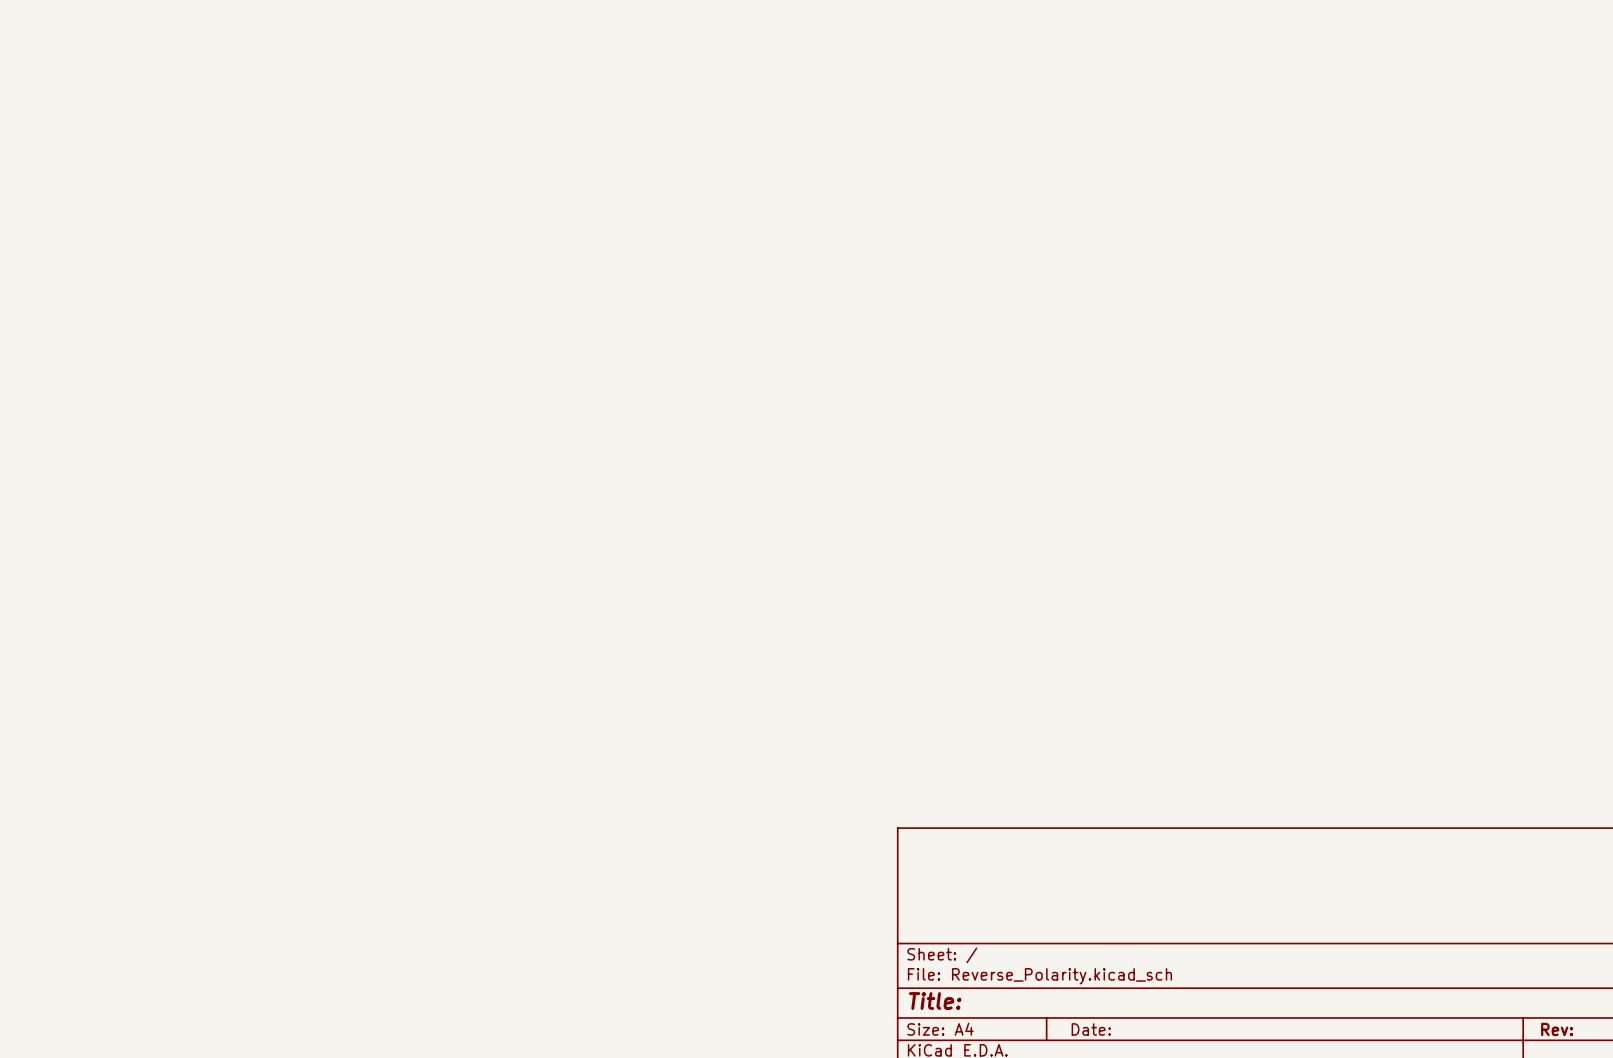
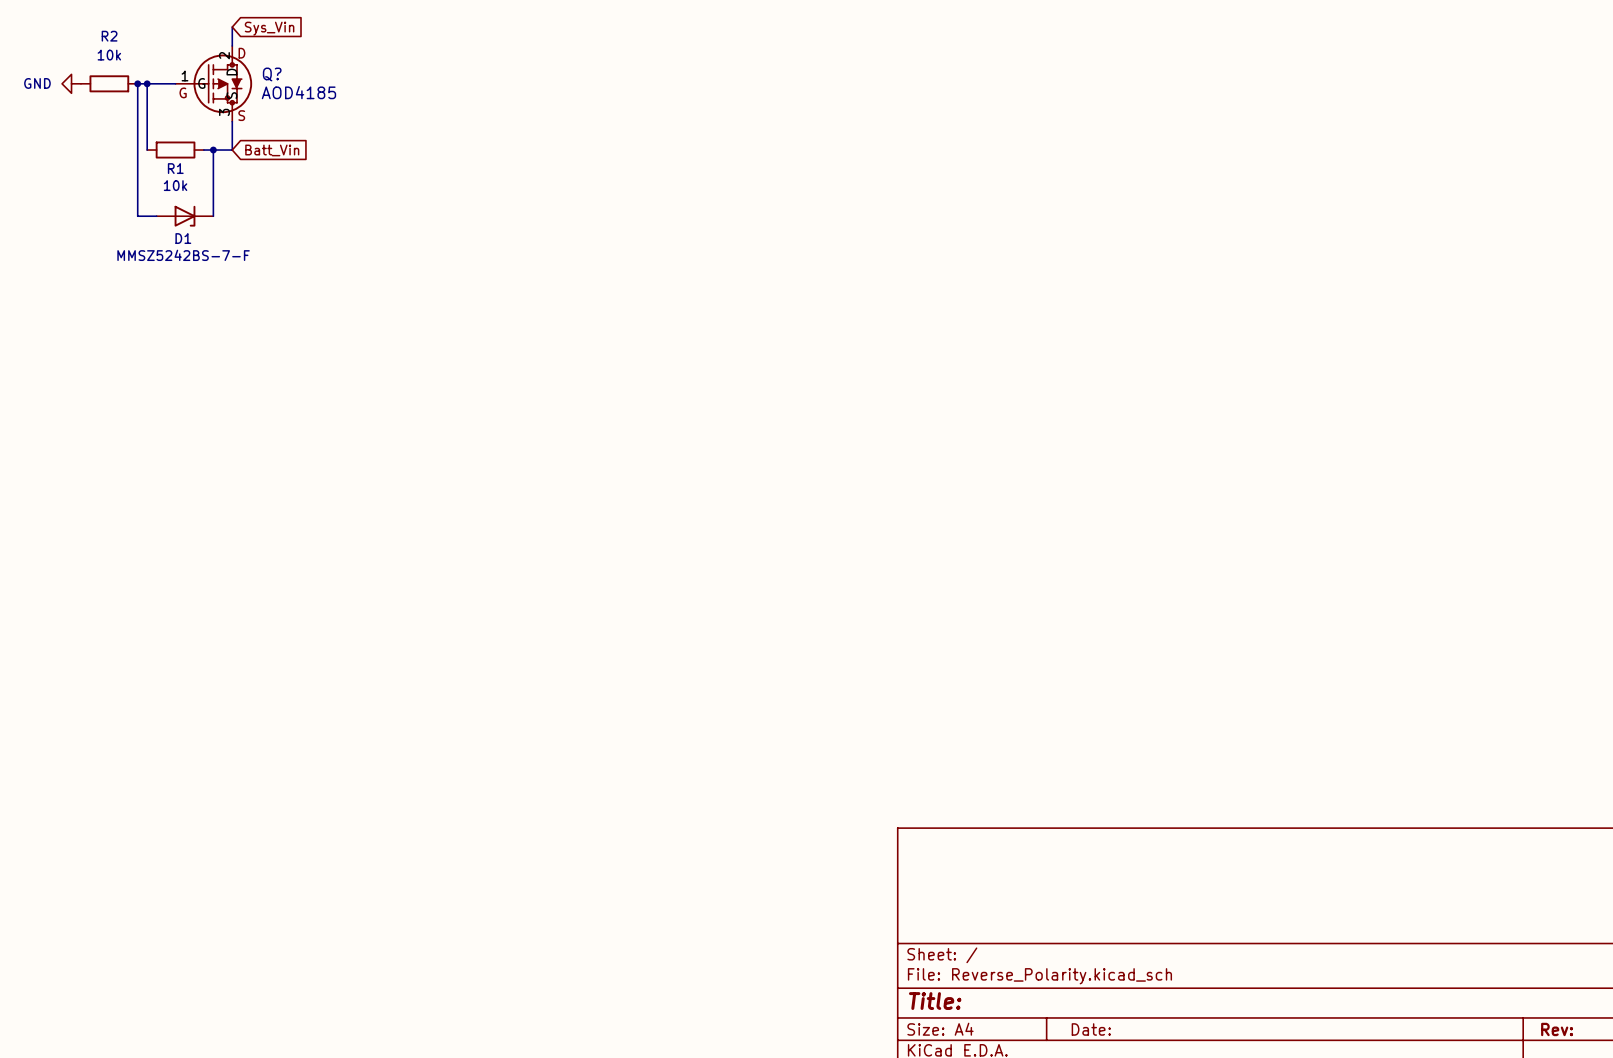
wire: none -> (232, 27) (232, 45)
global label: none -> Sys_Vin (269, 28)
power symbol: none -> GND (71, 83)
R2: none -> 10k (109, 83)
junction: none -> (137, 83)
wire: none -> (147, 83) (147, 150)
junction: none -> (147, 83)
wire: none -> (175, 83) (137, 83) (137, 216) (156, 216)
Q?: none -> AOD4185 (213, 83)
wire: none -> (232, 121) (232, 150) (203, 150)
R1: none -> 10k (175, 150)
wire: none -> (213, 150) (213, 216)
junction: none -> (213, 150)
global label: none -> Batt_Vin (272, 150)
D1: none -> MMSZ5242BS-7-F (185, 216)

